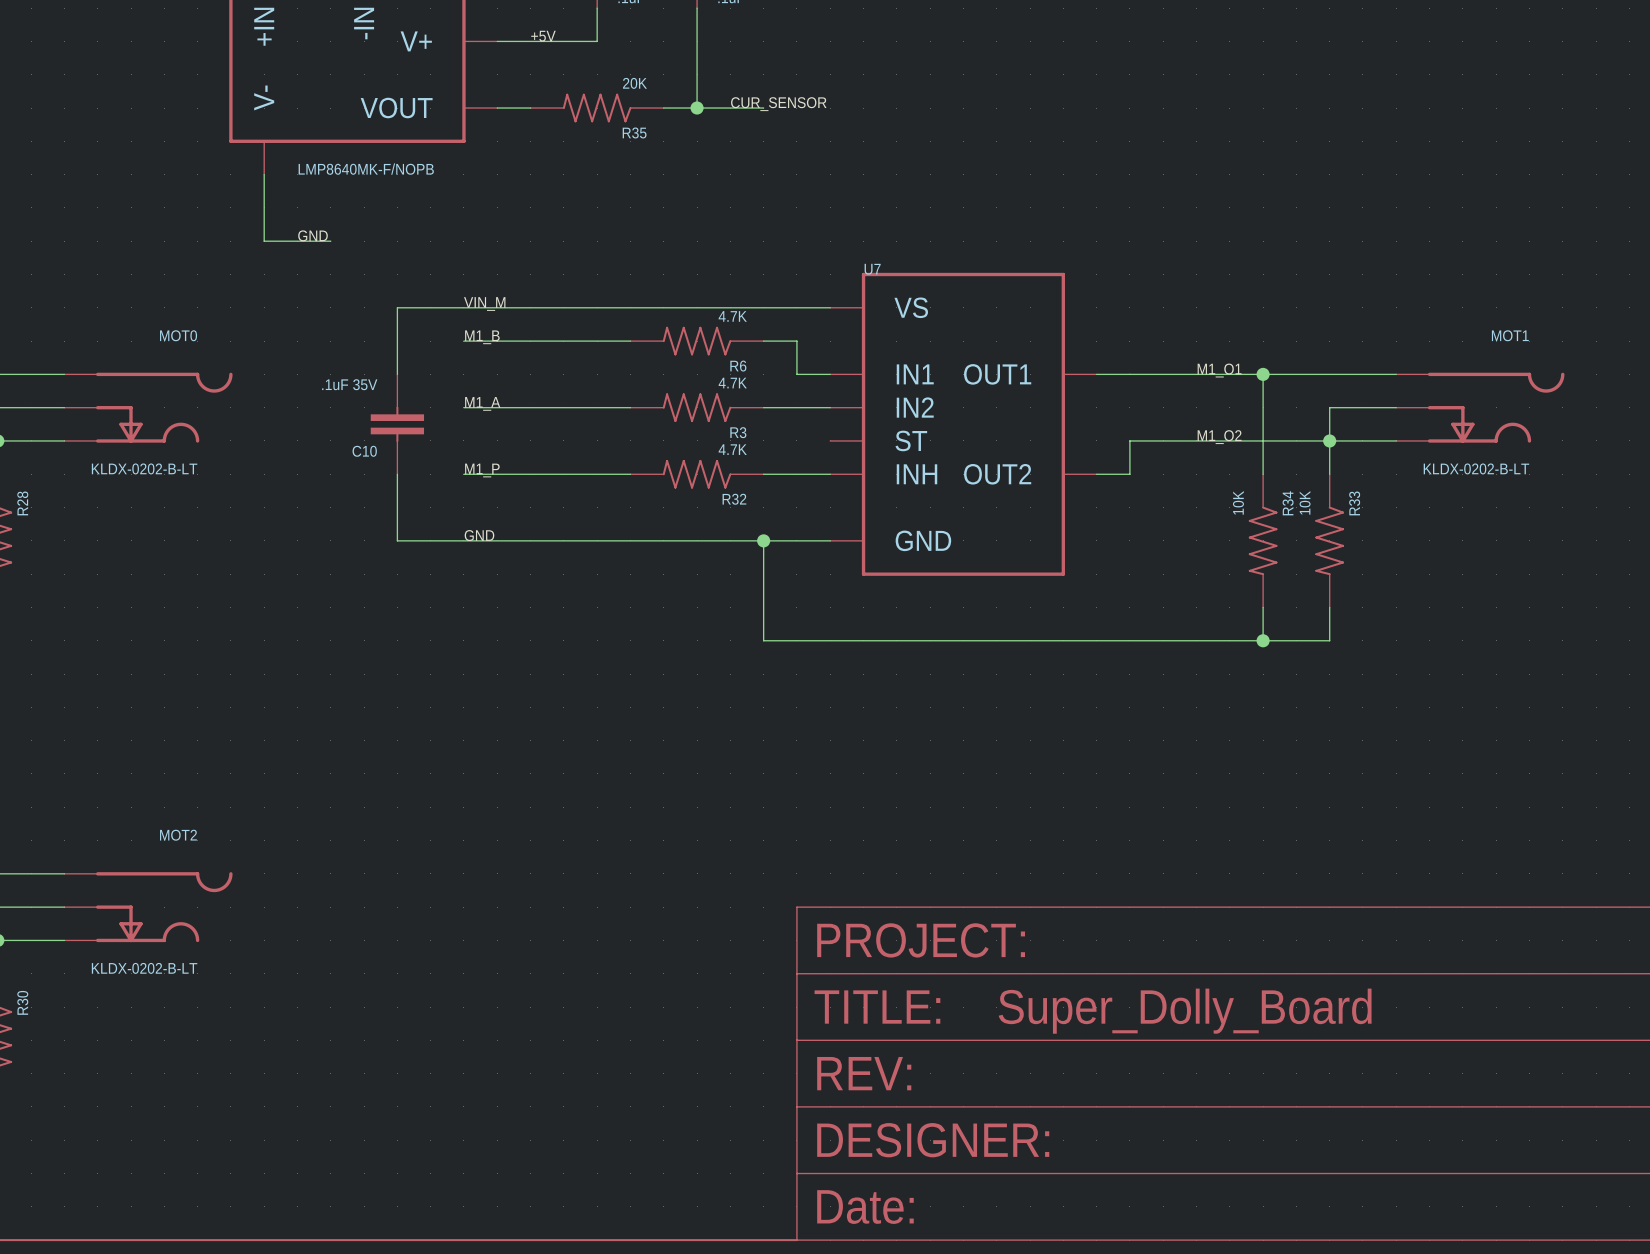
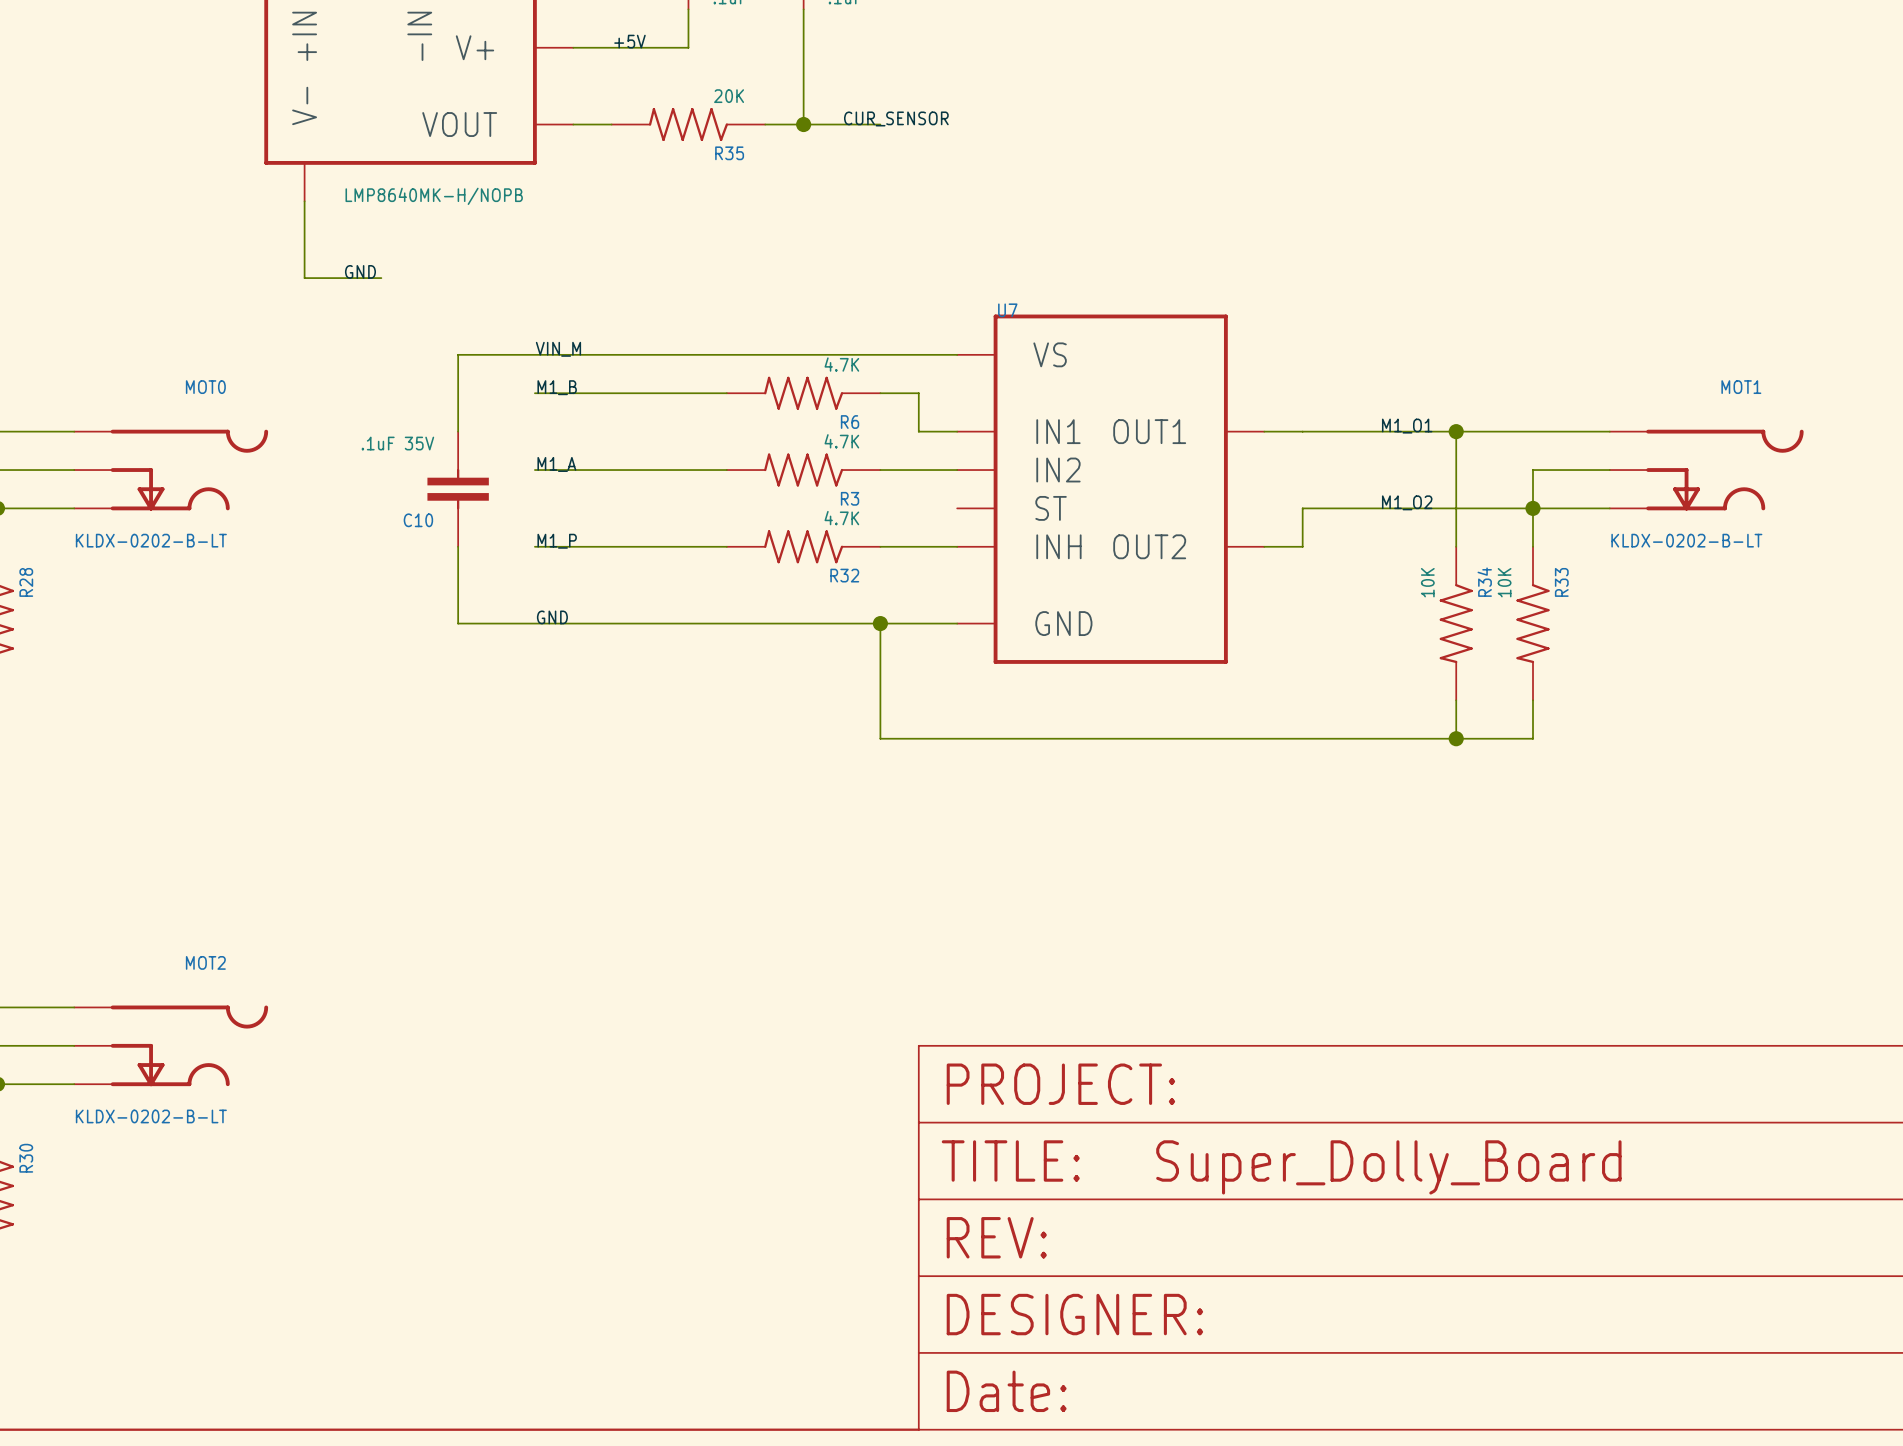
part value: LMP8640MK-F/NOPB (366, 169) -> LMP8640MK-H/NOPB (434, 196)

